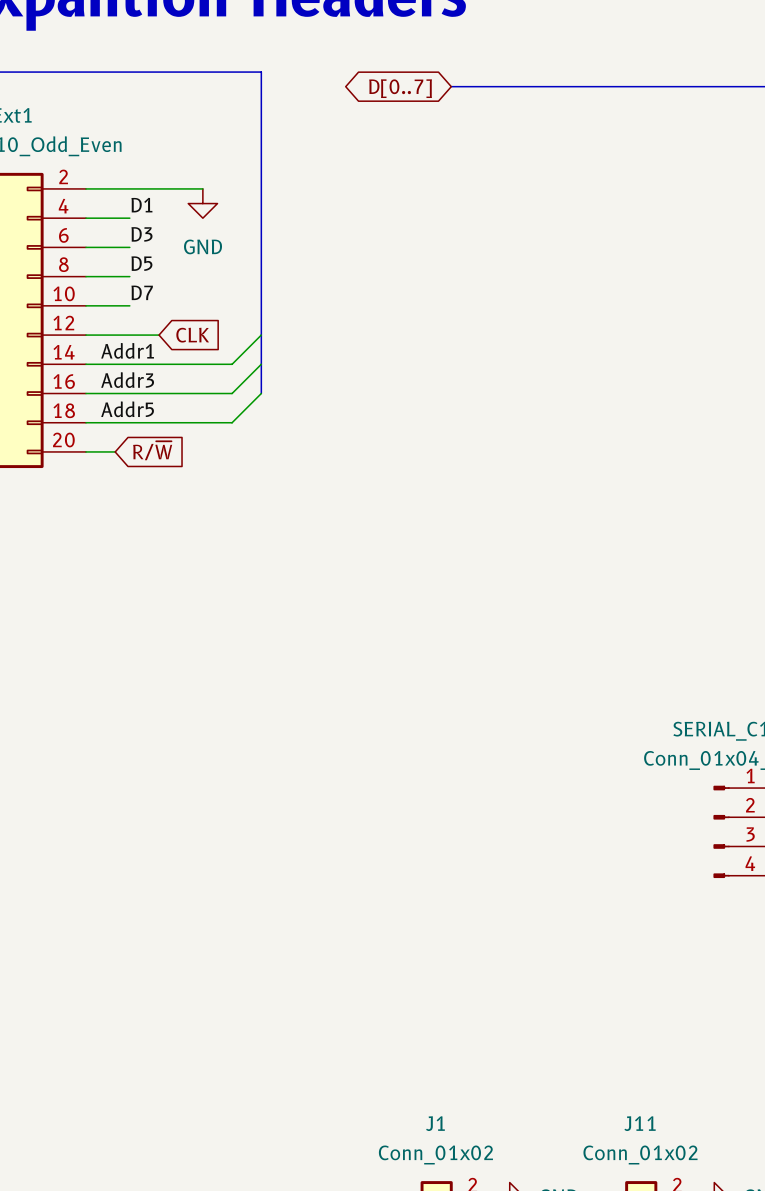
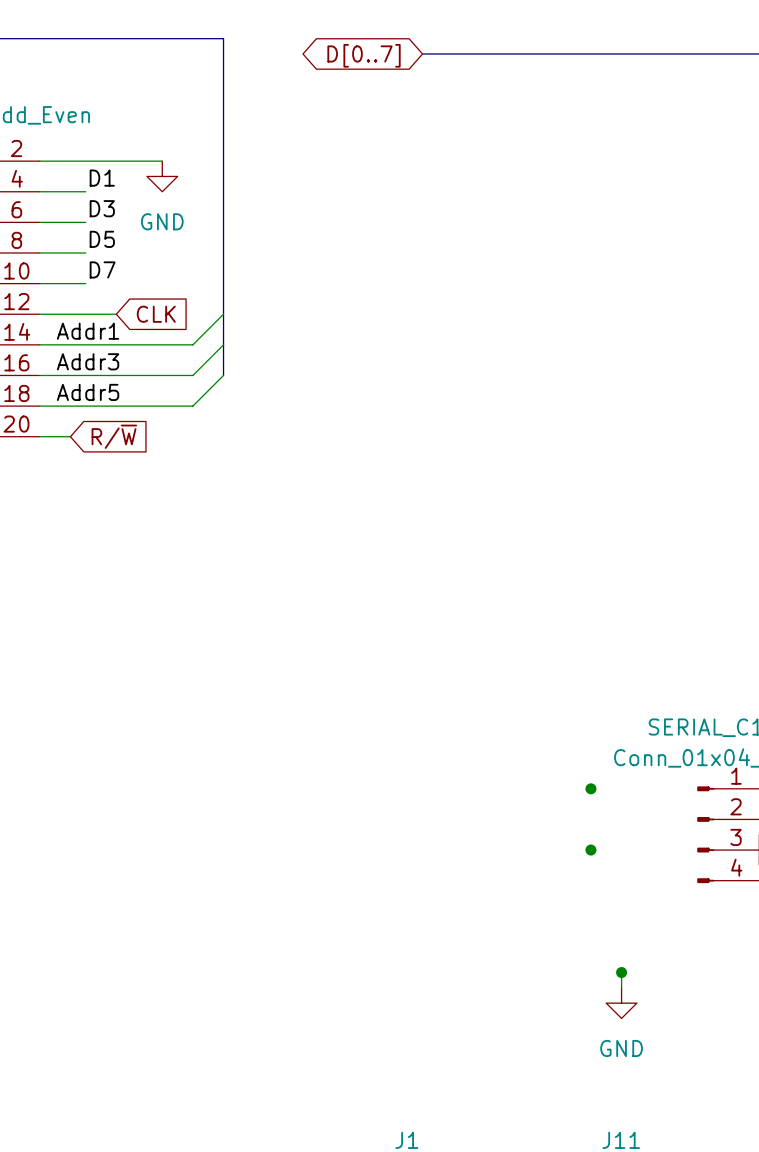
junction: none -> (590, 788)
junction: none -> (590, 850)
wire: none -> (621, 972) (621, 987)
junction: none -> (621, 972)
power symbol: none -> GND (621, 1003)

